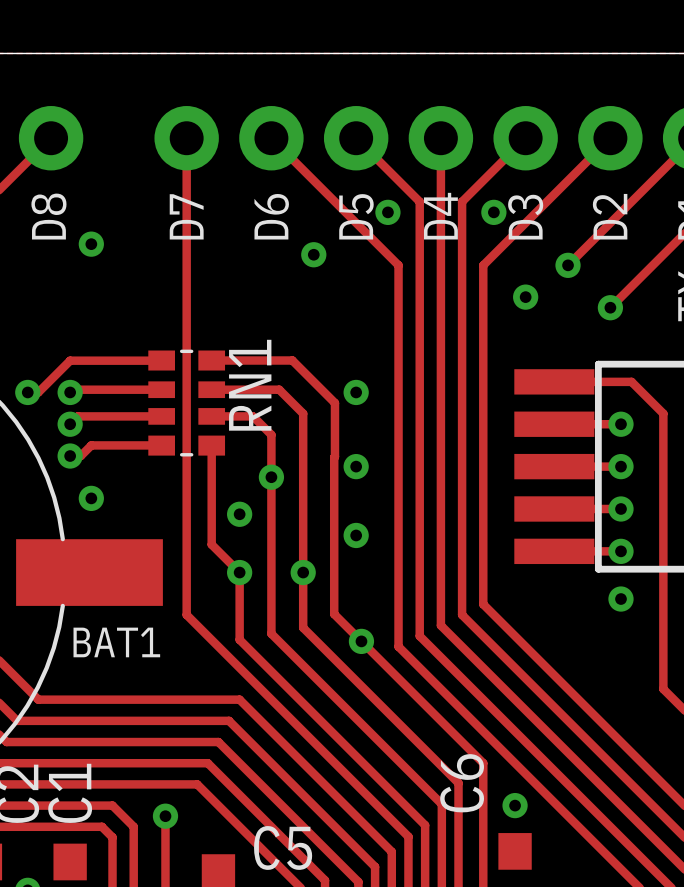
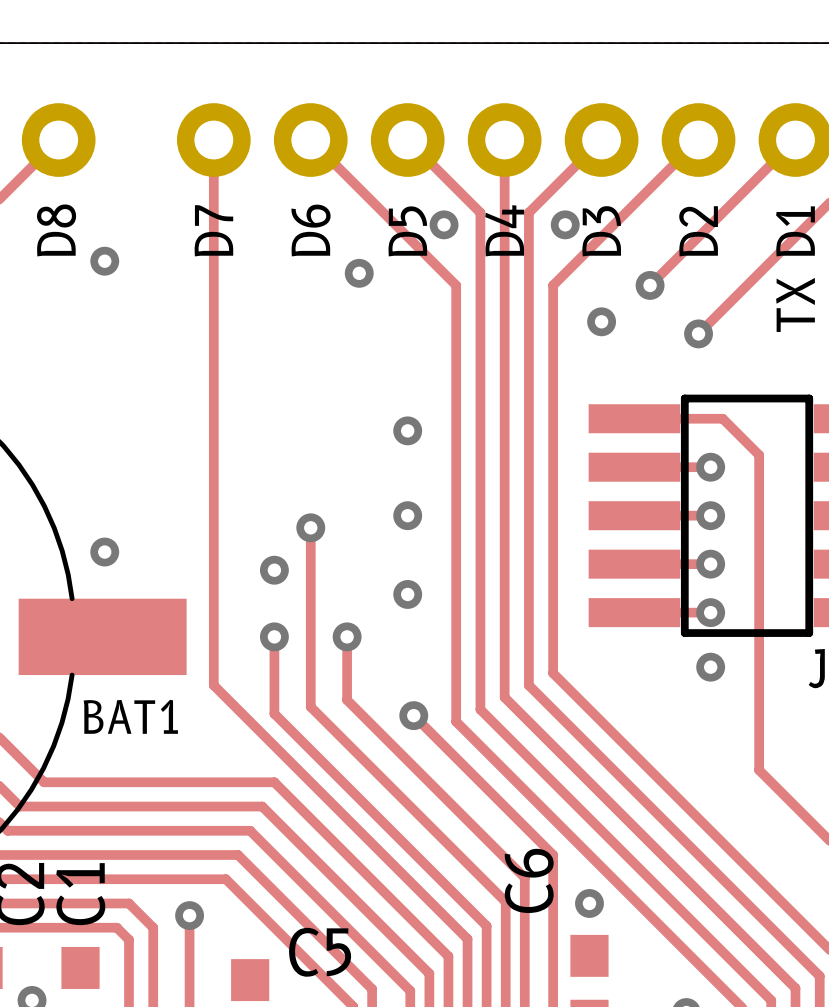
track: (161, 360) (70, 360) (38, 392) (27, 392) -> none
track: (211, 360) (292, 360) (334, 403) (334, 614) (361, 641) -> none
track: (161, 389) (72, 389) (70, 392) -> none
track: (211, 389) (279, 389) (303, 413) (303, 572) -> none
via: (27, 392) -> none
via: (70, 392) -> none
RN1: (186, 403) -> none
track: (161, 416) (77, 416) (70, 424) -> none
track: (211, 416) (252, 416) (271, 434) (271, 477) -> none
via: (70, 424) -> none
track: (161, 445) (91, 445) (80, 456) (70, 456) -> none
track: (211, 445) (211, 544) (239, 572) -> none
via: (70, 456) -> none

